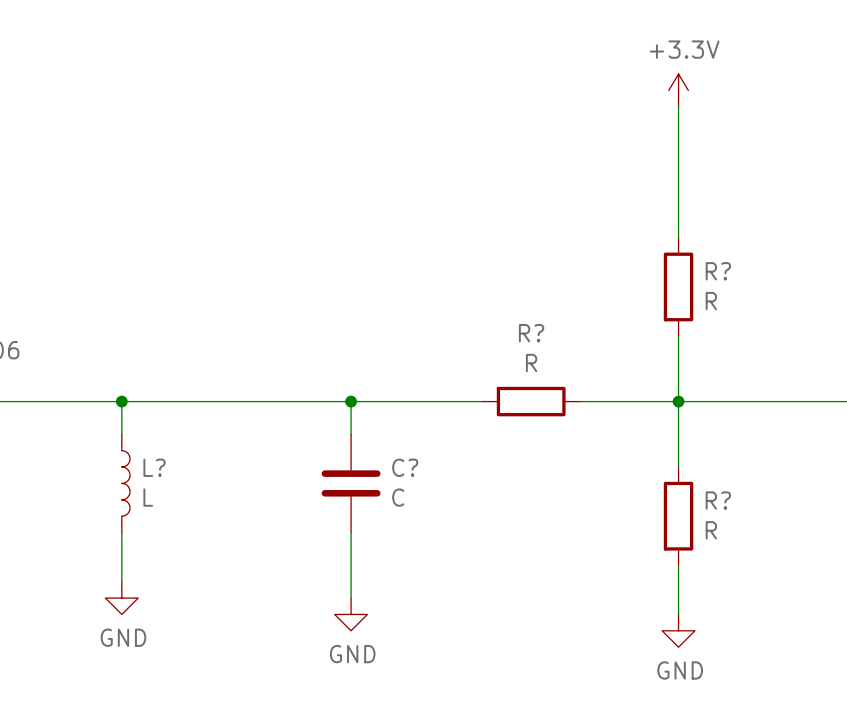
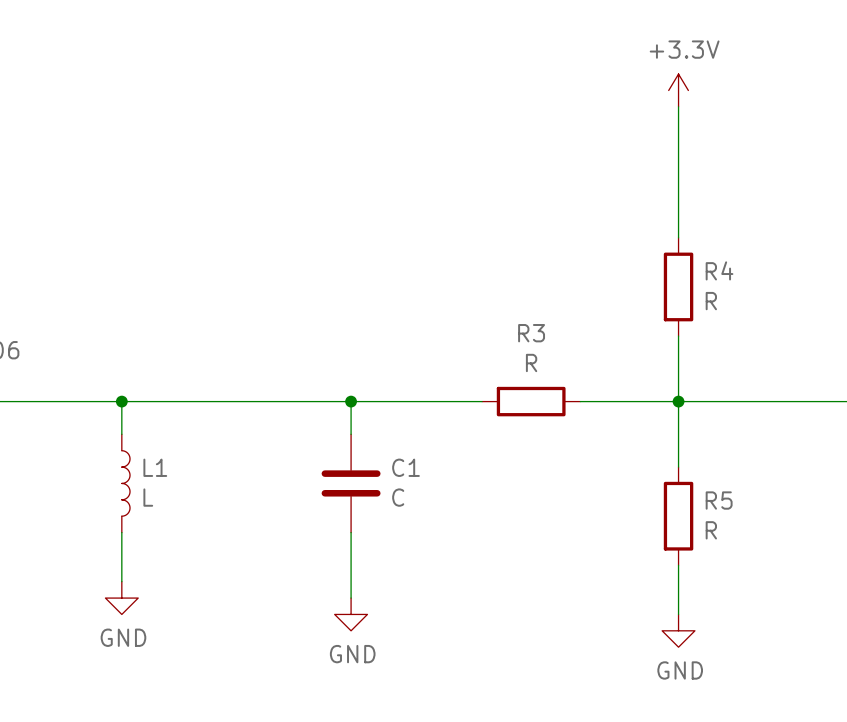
R? name: R? (718, 271) -> R4 (719, 270)
R? name: R? (531, 333) -> R3 (531, 333)
L? name: L? (154, 467) -> L1 (155, 467)
C? name: C? (405, 467) -> C1 (406, 467)
R? name: R? (718, 500) -> R5 (719, 500)

